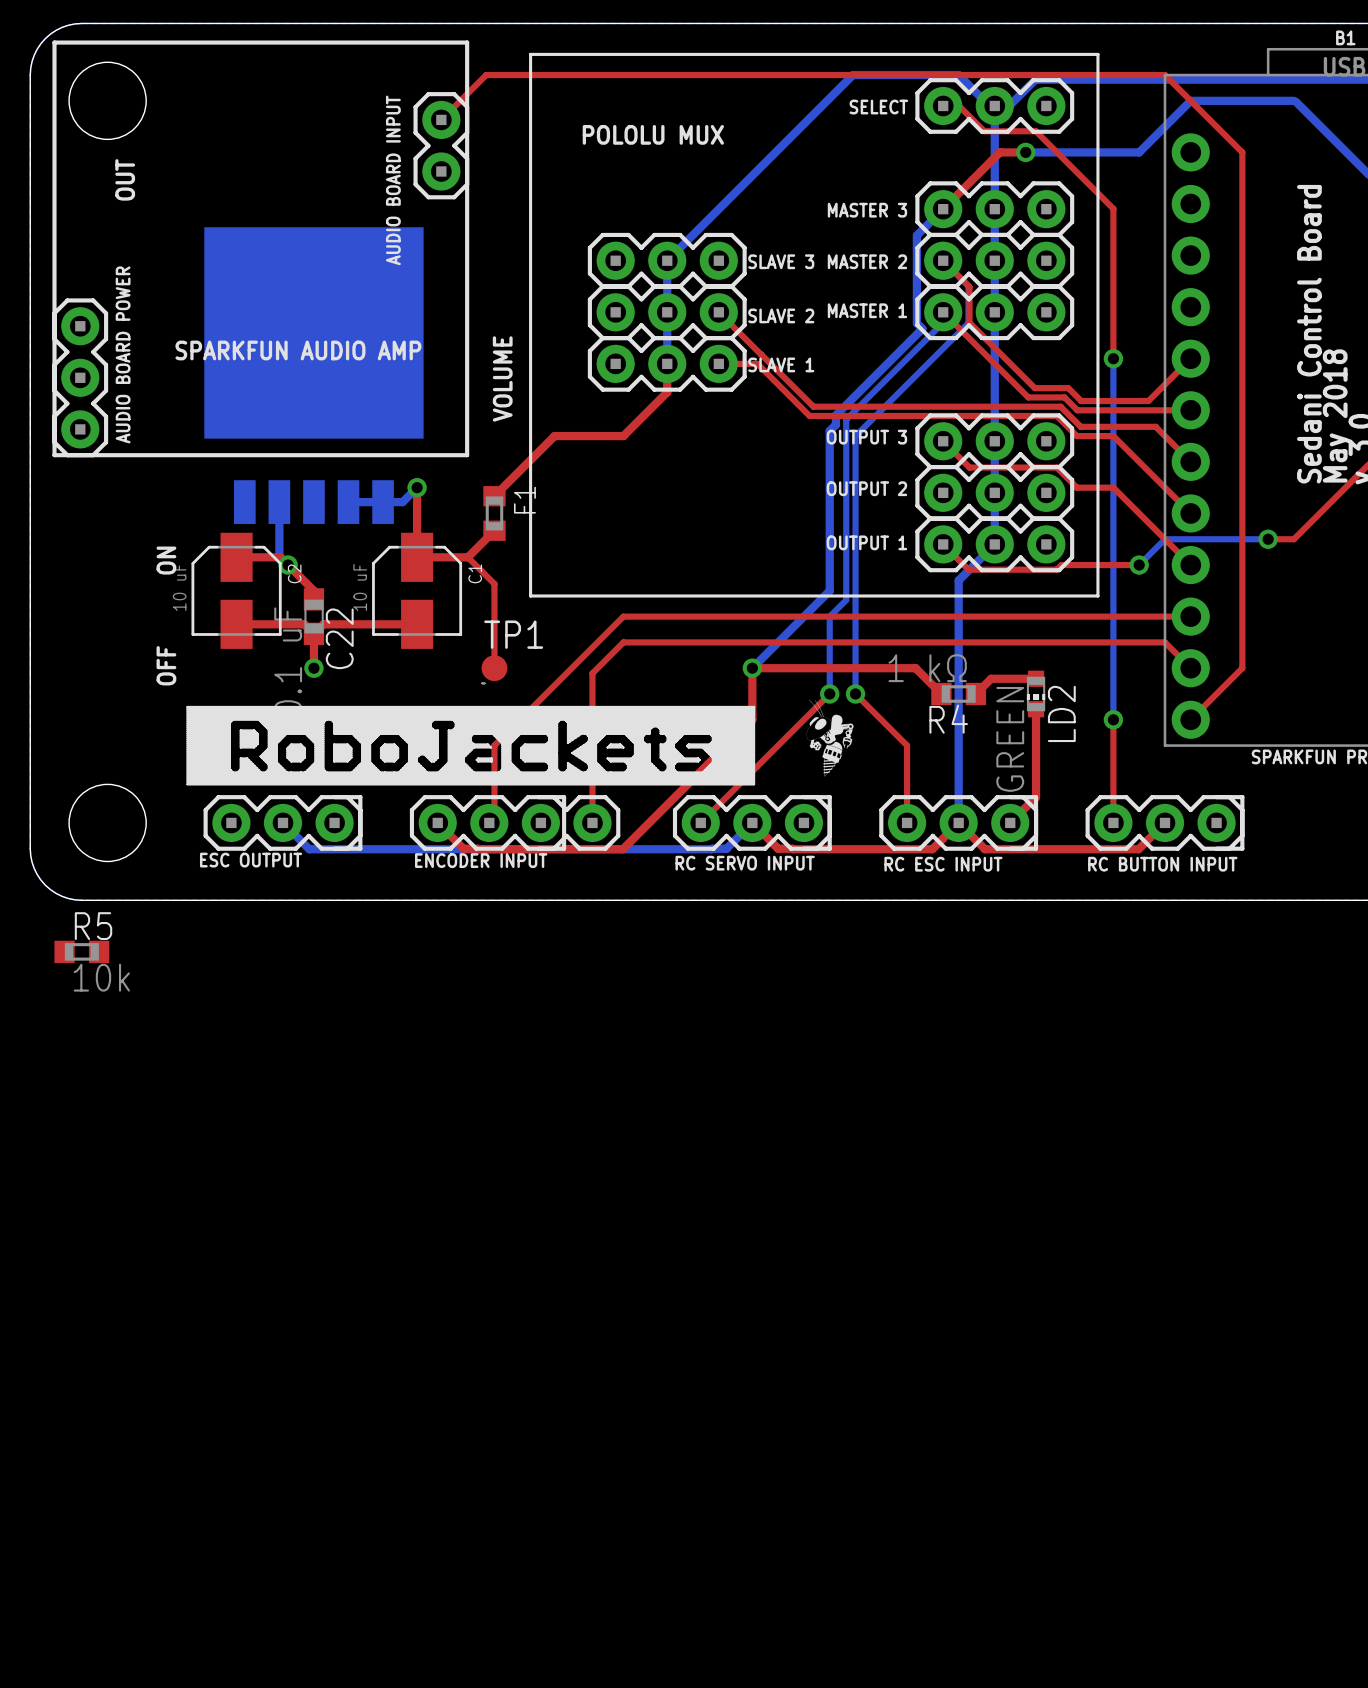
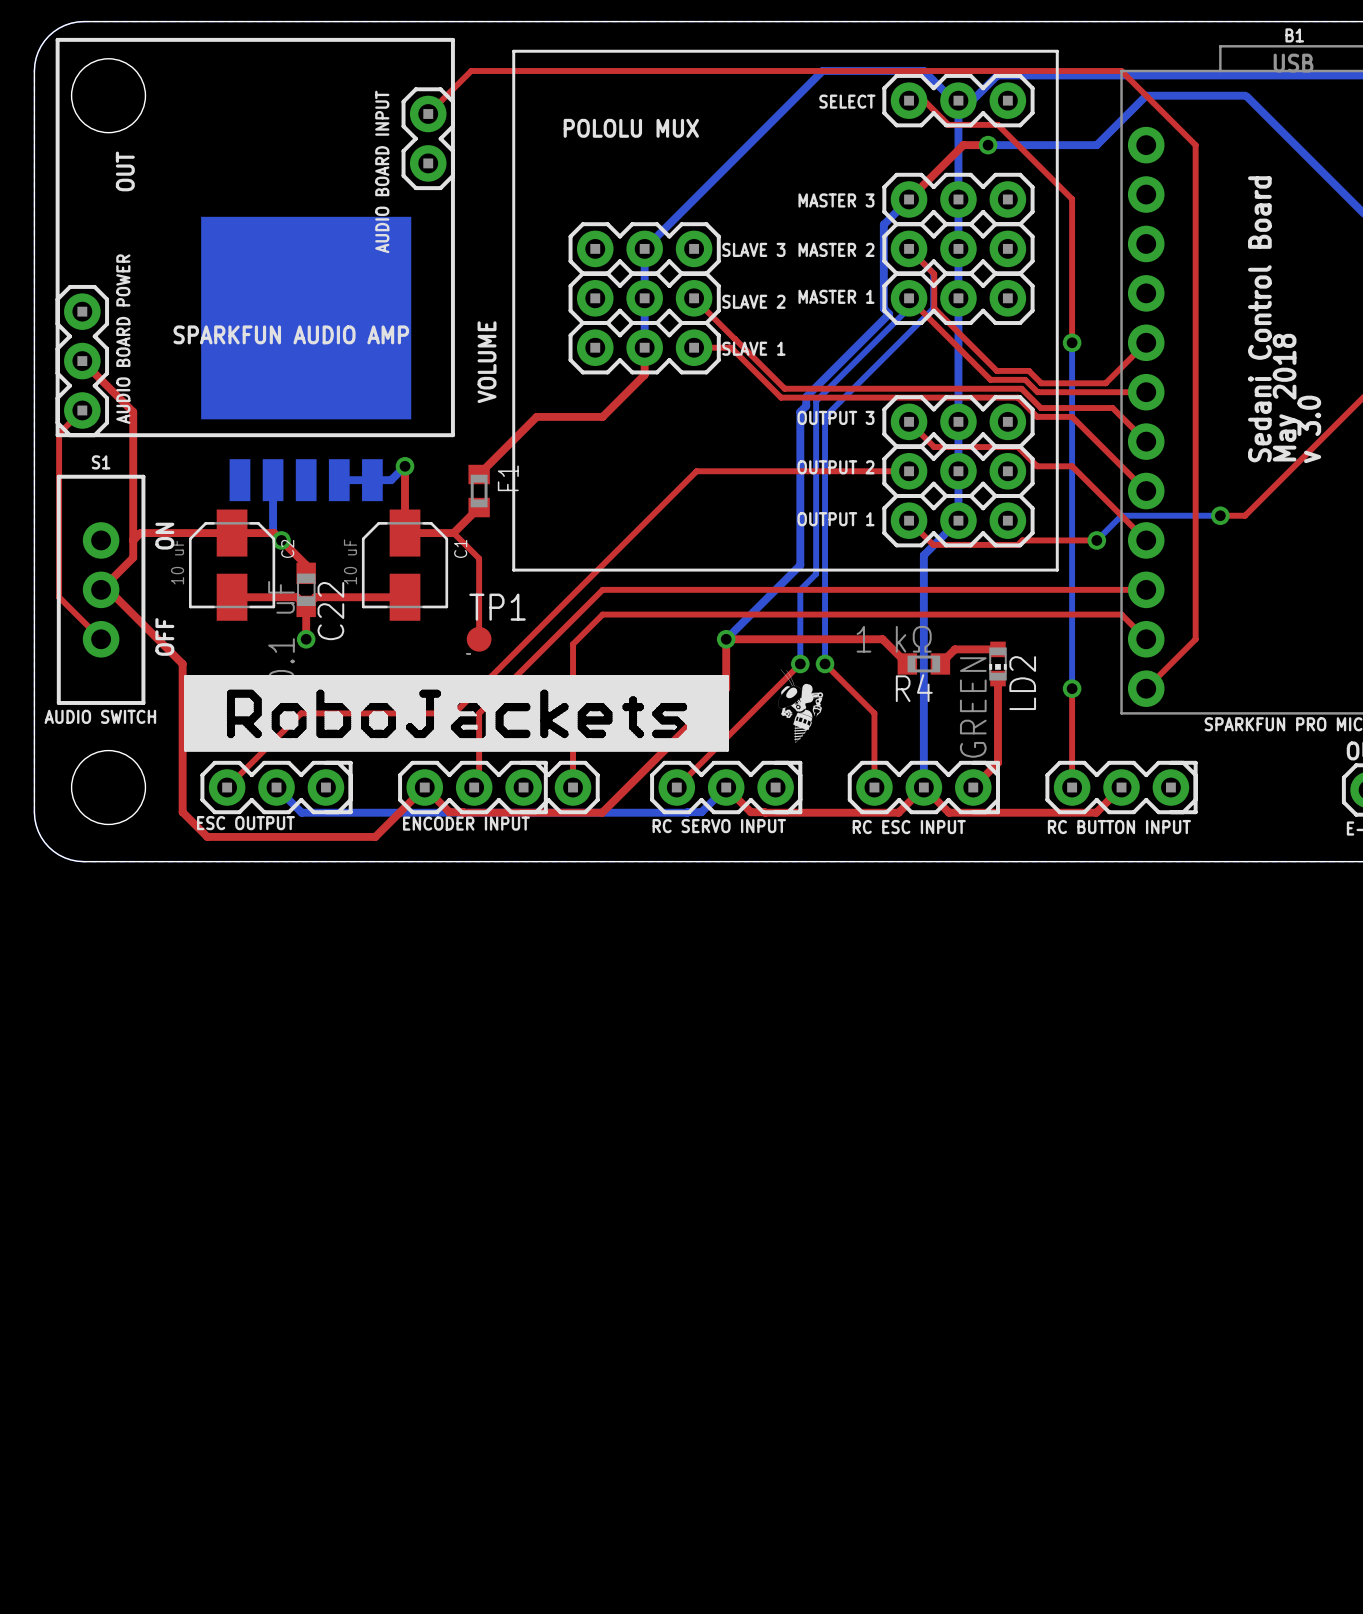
top track: none -> (82, 361) (133, 411) (133, 557) (104, 586)
top track: none -> (82, 410) (59, 433) (59, 597) (101, 639)
top track: none -> (909, 471) (696, 471) (454, 713) (301, 713) (227, 787)
top track: none -> (232, 533) (140, 533) (133, 540)
top track: none -> (104, 586) (182, 663) (182, 812) (207, 836) (375, 836) (424, 787)
S1: none -> AUDIO SWITCH (101, 589)
R5: 10k (81, 951) -> none

